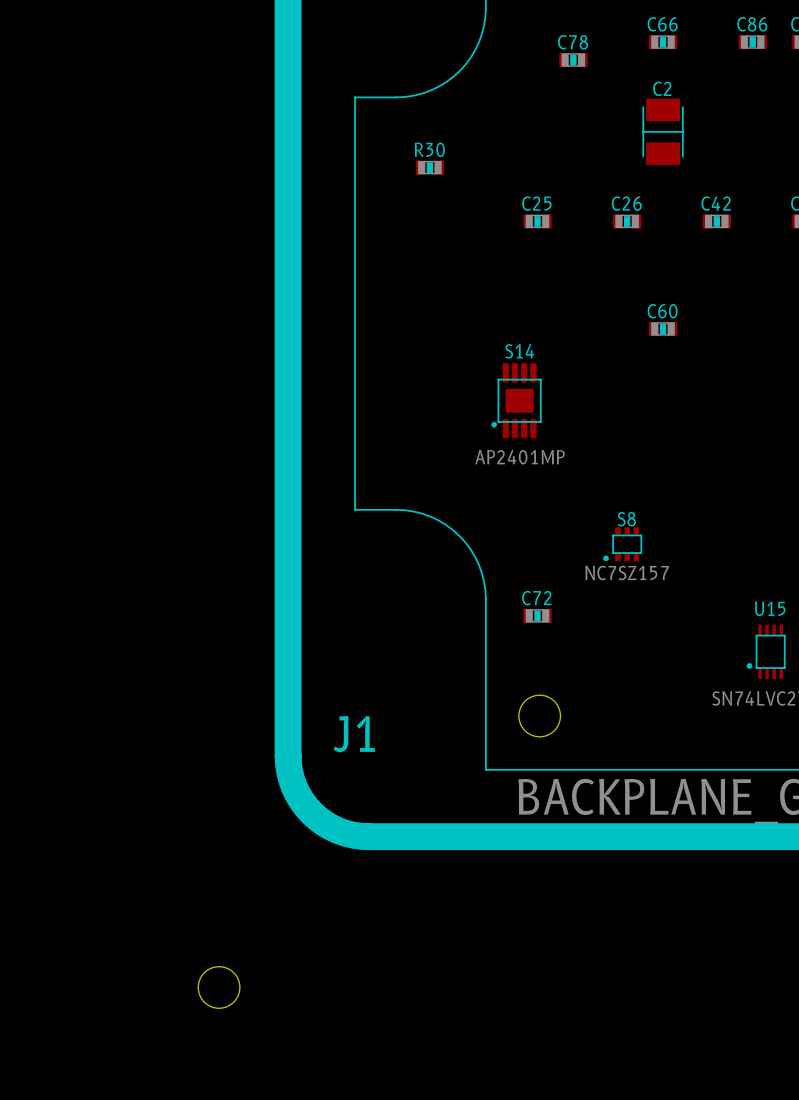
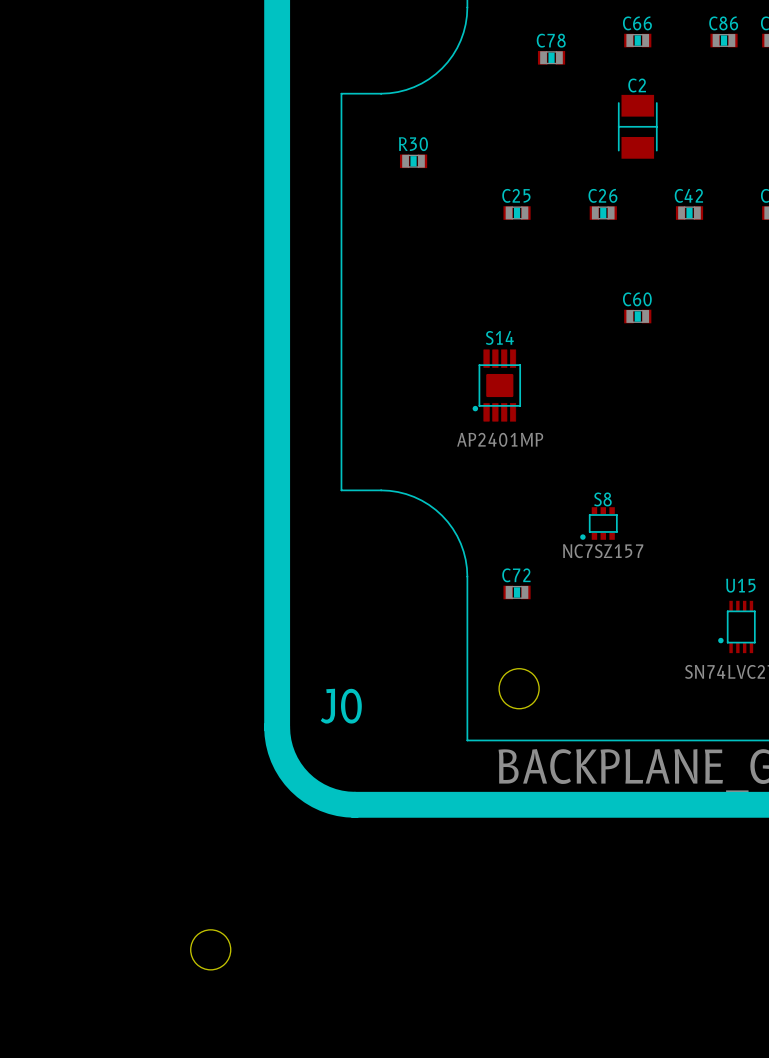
J1 name: J1 (354, 734) -> J0 (341, 706)

